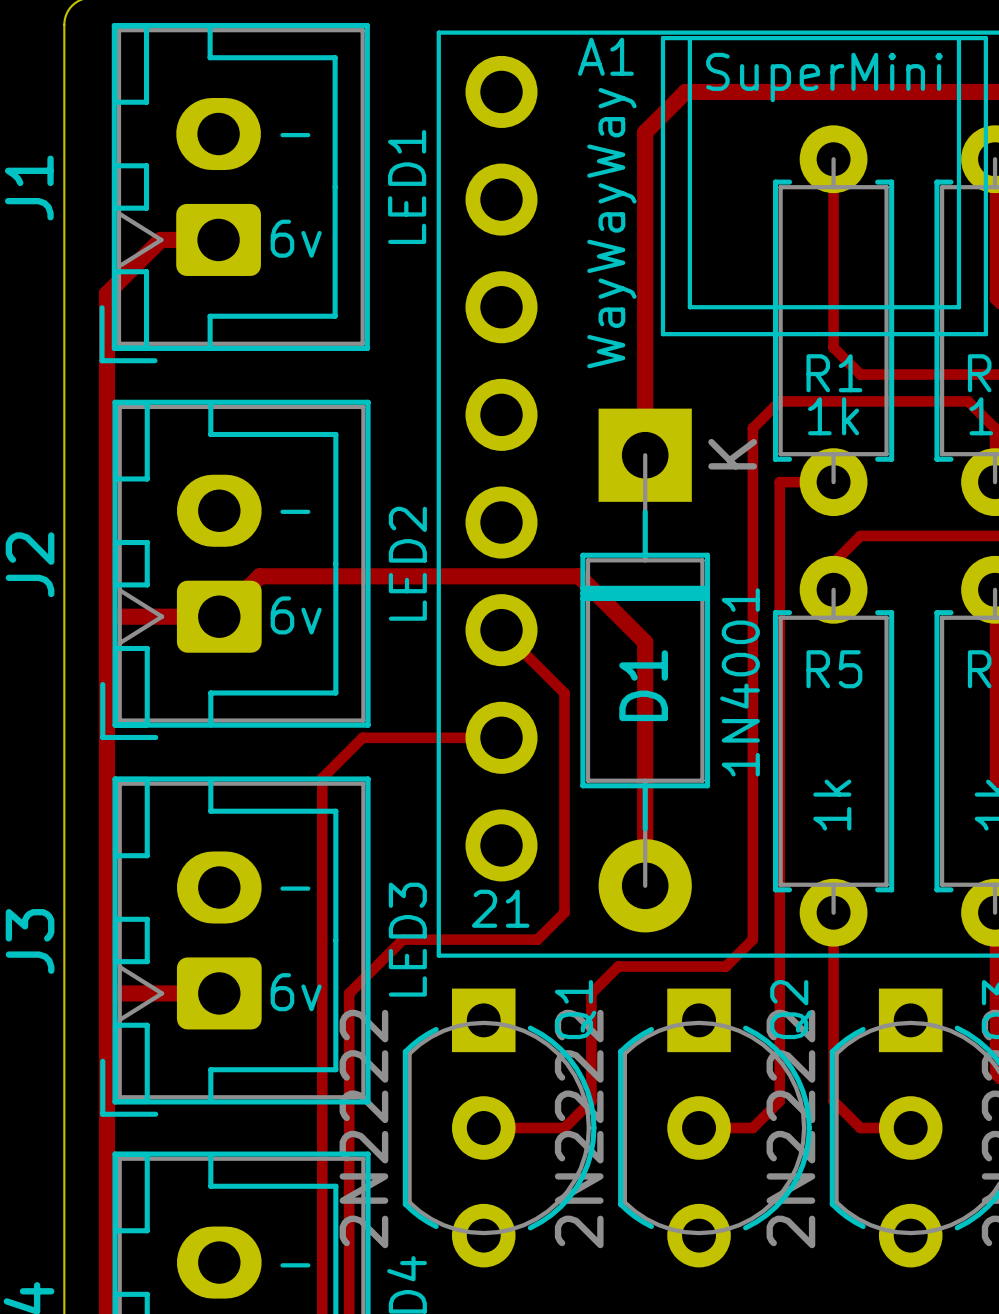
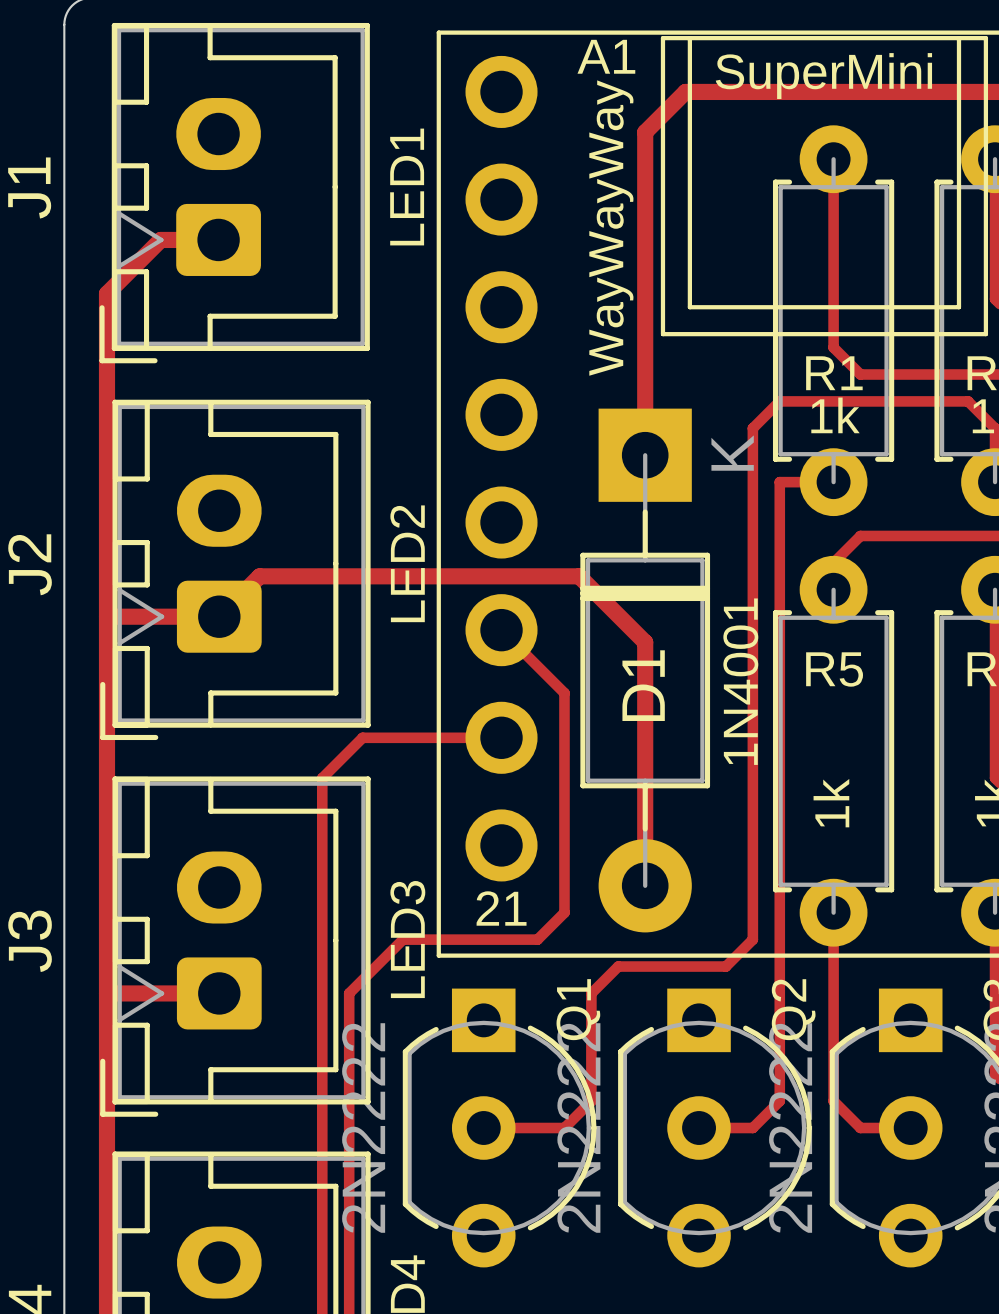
text: - (295, 135) -> none
text: 6v (296, 238) -> none
text: - (295, 511) -> none
text: 6v (296, 615) -> none
text: - (295, 888) -> none
text: 6v (296, 992) -> none
text: - (295, 1265) -> none

